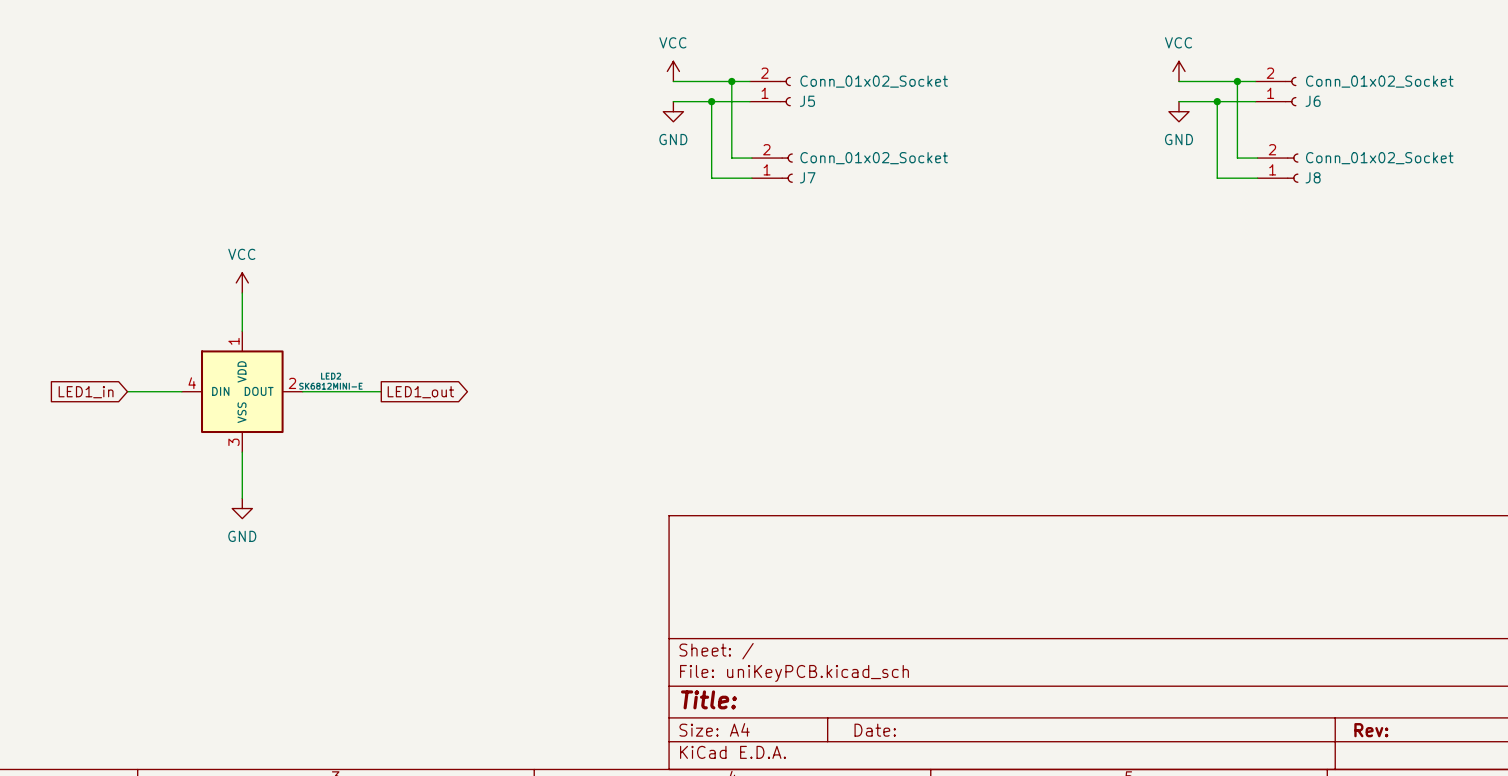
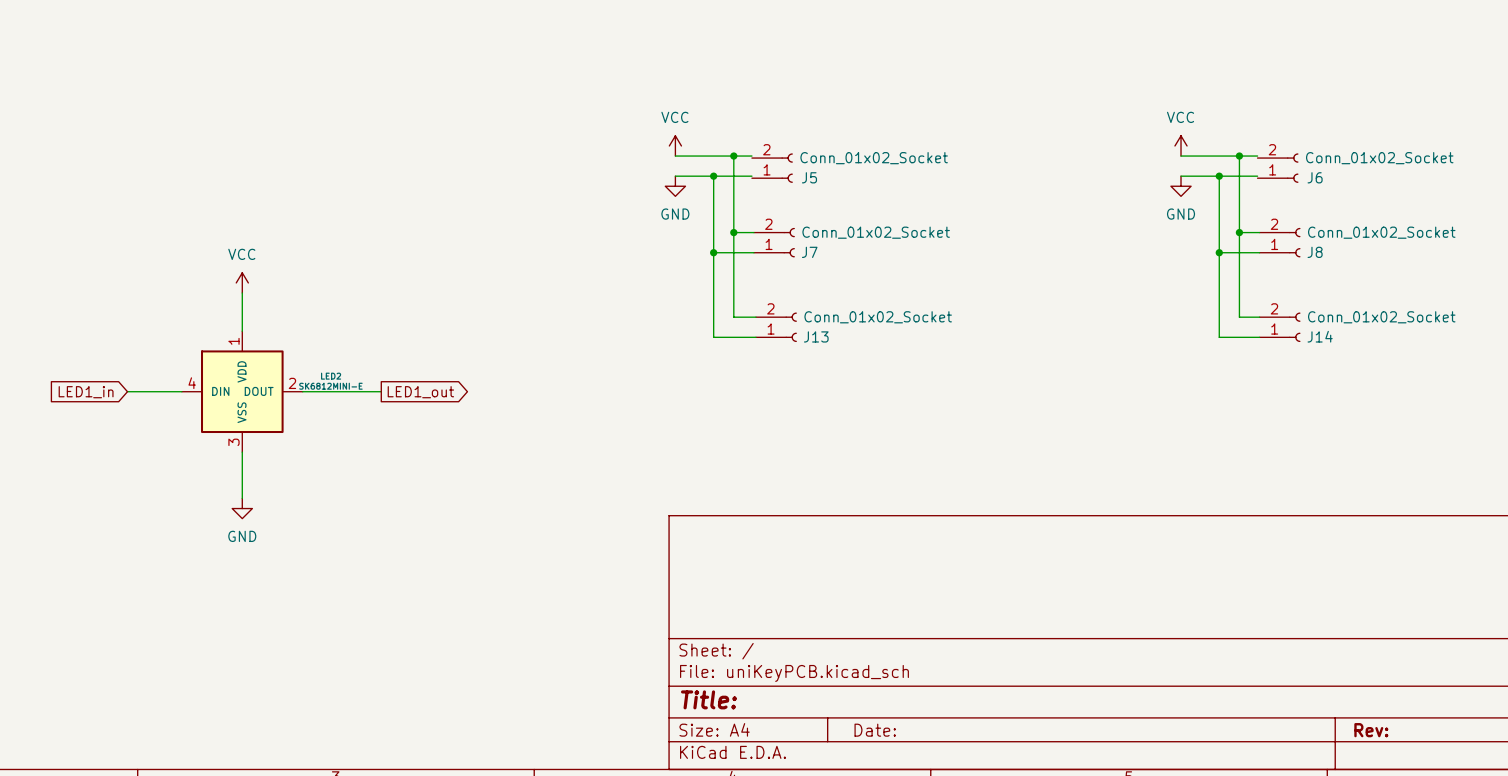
power symbol position: VCC (673, 71) -> VCC (675, 145)
power symbol position: VCC (1178, 71) -> VCC (1181, 145)
wire: (673, 81) (749, 81) -> (675, 156) (751, 156)
wire: (731, 81) (731, 158) (751, 158) -> none
junction: (731, 81) -> none
wire: (1178, 81) (1255, 81) -> (1181, 156) (1257, 156)
wire: (1237, 81) (1237, 158) (1257, 158) -> none
junction: (1237, 81) -> none
J5: Conn_01x02_Socket (770, 91) -> none
J6: Conn_01x02_Socket (1275, 91) -> none
wire: (673, 101) (749, 101) -> (675, 176) (751, 176)
wire: (711, 101) (711, 178) (751, 178) -> none
junction: (711, 101) -> none
wire: (1178, 101) (1255, 101) -> (1181, 176) (1257, 176)
wire: (1217, 101) (1217, 178) (1257, 178) -> none
junction: (1217, 101) -> none
power symbol position: GND (673, 111) -> GND (675, 186)
power symbol position: GND (1178, 111) -> GND (1181, 186)
wire: none -> (733, 156) (733, 317) (755, 317)
junction: none -> (733, 156)
wire: none -> (1239, 156) (1239, 317) (1259, 317)
junction: none -> (1239, 156)
wire: none -> (713, 176) (713, 337) (755, 337)
junction: none -> (713, 176)
wire: none -> (1219, 176) (1219, 337) (1259, 337)
junction: none -> (1219, 176)
J7 name: J7 (807, 177) -> J5 (809, 177)
J8 name: J8 (1313, 177) -> J6 (1315, 177)
wire: none -> (733, 232) (753, 232)
junction: none -> (733, 232)
wire: none -> (1239, 232) (1259, 232)
junction: none -> (1239, 232)
J7: none -> Conn_01x02_Socket (774, 242)
J8: none -> Conn_01x02_Socket (1280, 242)
wire: none -> (713, 252) (753, 252)
junction: none -> (713, 252)
wire: none -> (1219, 252) (1259, 252)
junction: none -> (1219, 252)
J13: none -> Conn_01x02_Socket (776, 327)
J14: none -> Conn_01x02_Socket (1280, 327)

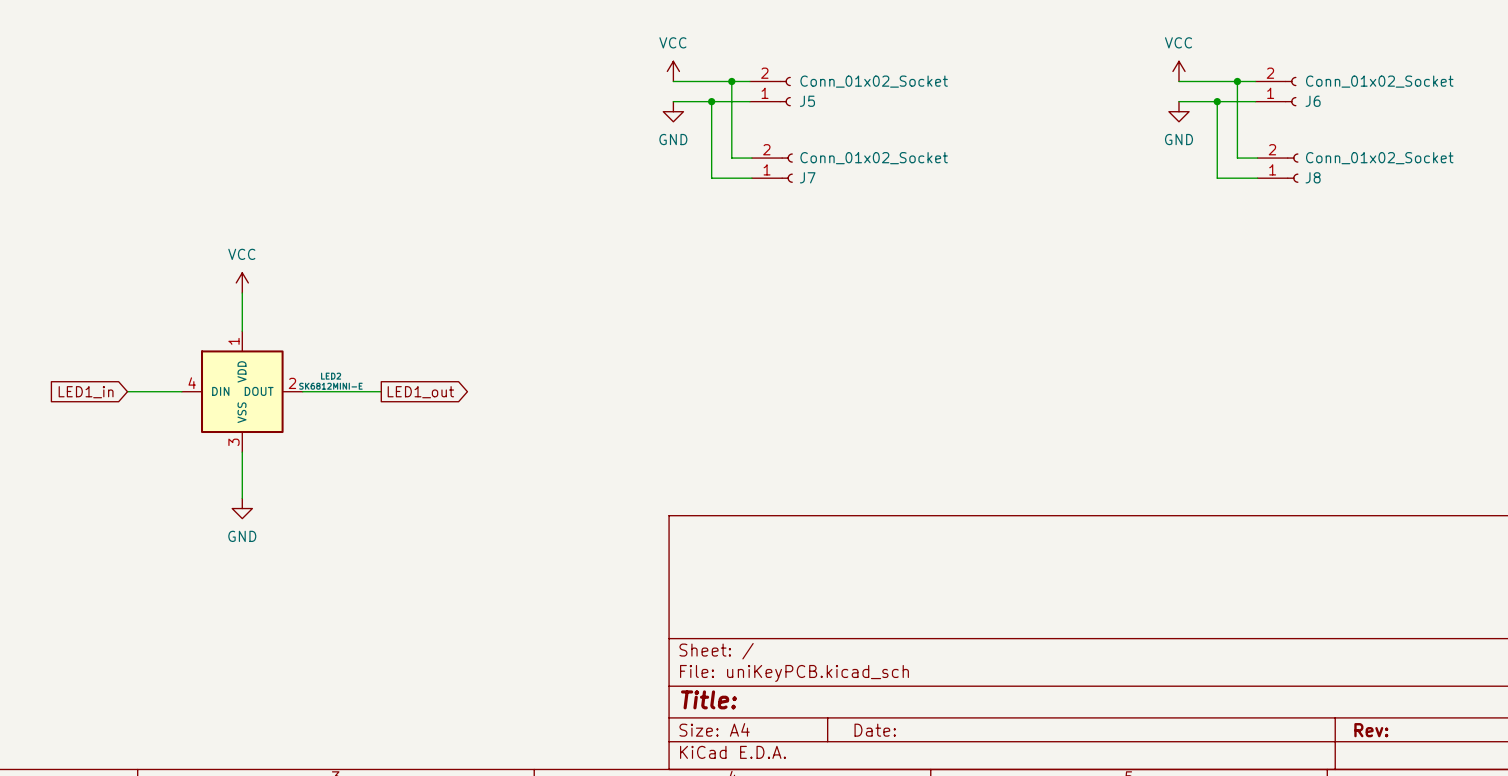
wire: none -> (731, 81) (731, 158) (751, 158)
junction: none -> (731, 81)
wire: none -> (1237, 81) (1237, 158) (1257, 158)
junction: none -> (1237, 81)
J5: none -> Conn_01x02_Socket (770, 91)
J6: none -> Conn_01x02_Socket (1275, 91)
wire: none -> (711, 101) (711, 178) (751, 178)
junction: none -> (711, 101)
wire: none -> (1217, 101) (1217, 178) (1257, 178)
junction: none -> (1217, 101)
power symbol position: VCC (675, 145) -> VCC (673, 71)
power symbol position: VCC (1181, 145) -> VCC (1178, 71)
wire: (675, 156) (751, 156) -> (673, 81) (749, 81)
wire: (733, 156) (733, 317) (755, 317) -> none
junction: (733, 156) -> none
wire: (1181, 156) (1257, 156) -> (1178, 81) (1255, 81)
wire: (1239, 156) (1239, 317) (1259, 317) -> none
junction: (1239, 156) -> none
wire: (675, 176) (751, 176) -> (673, 101) (749, 101)
wire: (713, 176) (713, 337) (755, 337) -> none
junction: (713, 176) -> none
wire: (1181, 176) (1257, 176) -> (1178, 101) (1255, 101)
wire: (1219, 176) (1219, 337) (1259, 337) -> none
junction: (1219, 176) -> none
J5 name: J5 (809, 177) -> J7 (807, 177)
J6 name: J6 (1315, 177) -> J8 (1313, 177)
power symbol position: GND (675, 186) -> GND (673, 111)
power symbol position: GND (1181, 186) -> GND (1178, 111)
wire: (733, 232) (753, 232) -> none
junction: (733, 232) -> none
wire: (1239, 232) (1259, 232) -> none
junction: (1239, 232) -> none
J7: Conn_01x02_Socket (774, 242) -> none
J8: Conn_01x02_Socket (1280, 242) -> none
wire: (713, 252) (753, 252) -> none
junction: (713, 252) -> none
wire: (1219, 252) (1259, 252) -> none
junction: (1219, 252) -> none
J13: Conn_01x02_Socket (776, 327) -> none
J14: Conn_01x02_Socket (1280, 327) -> none

